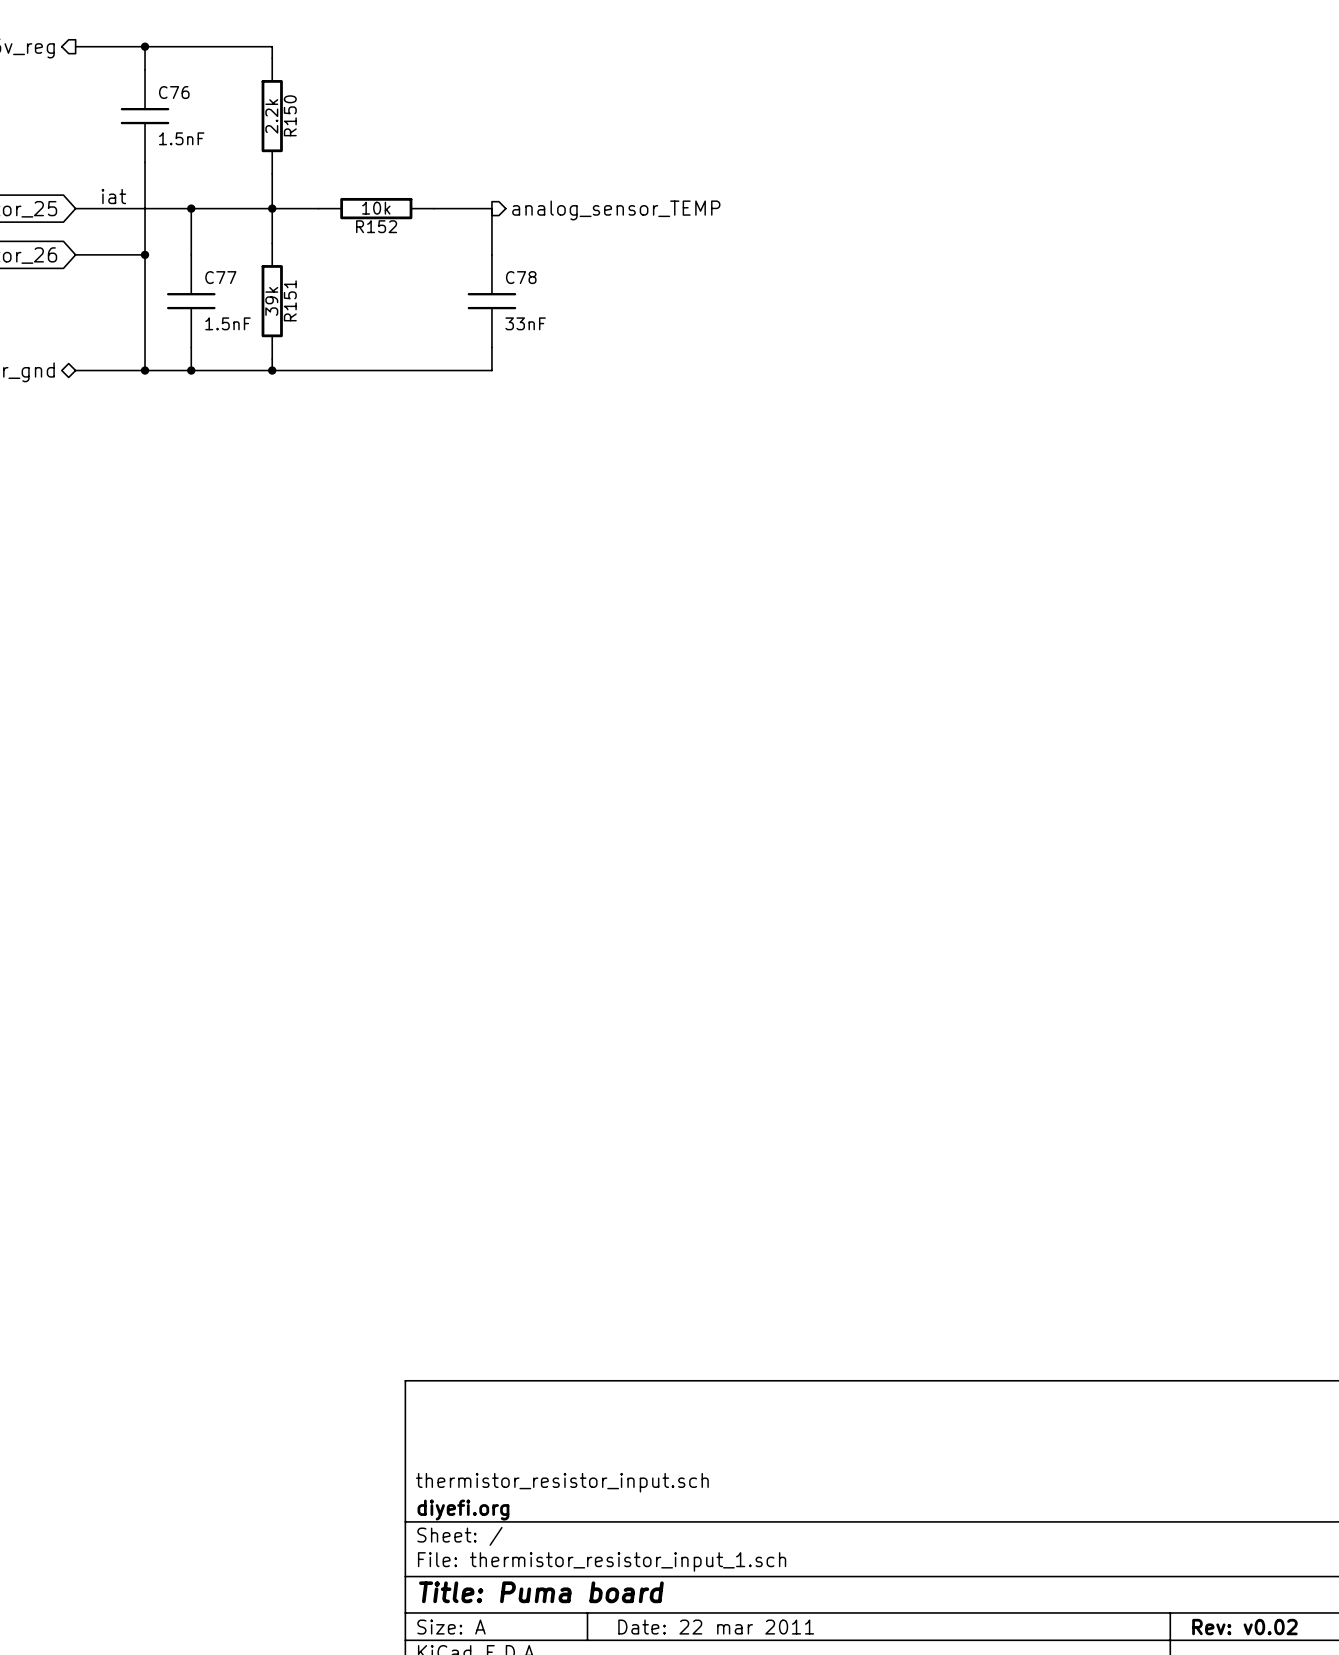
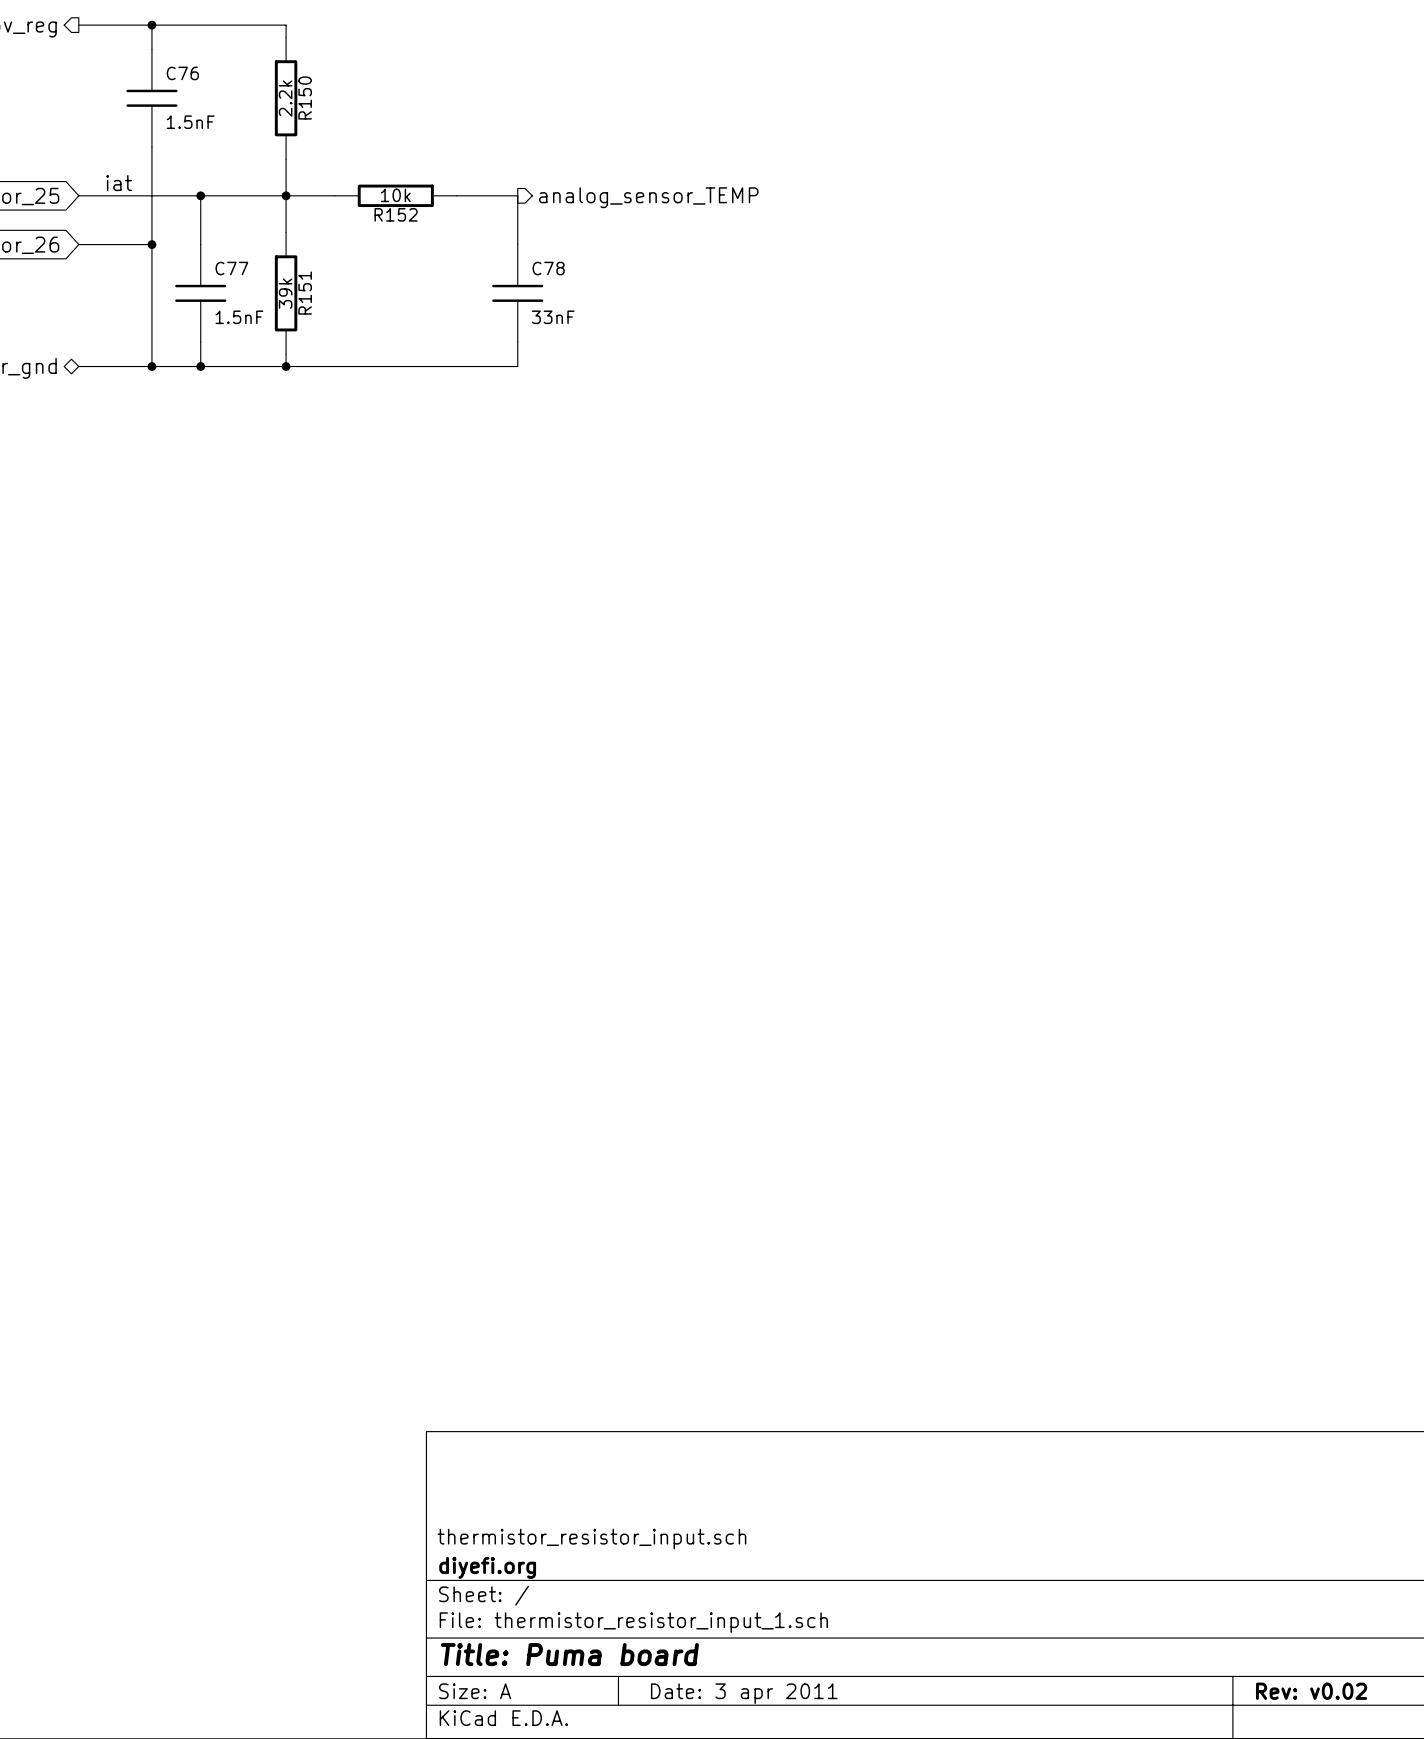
title block: Date: 22 mar 2011 (716, 1627) -> Date: 3 apr 2011 (744, 1693)

